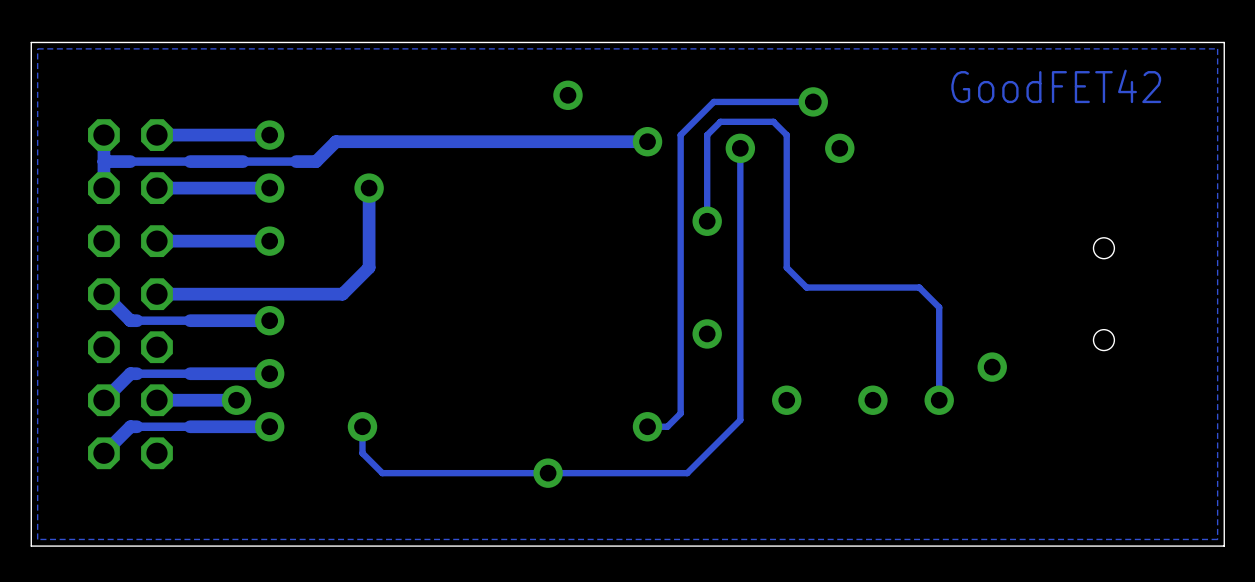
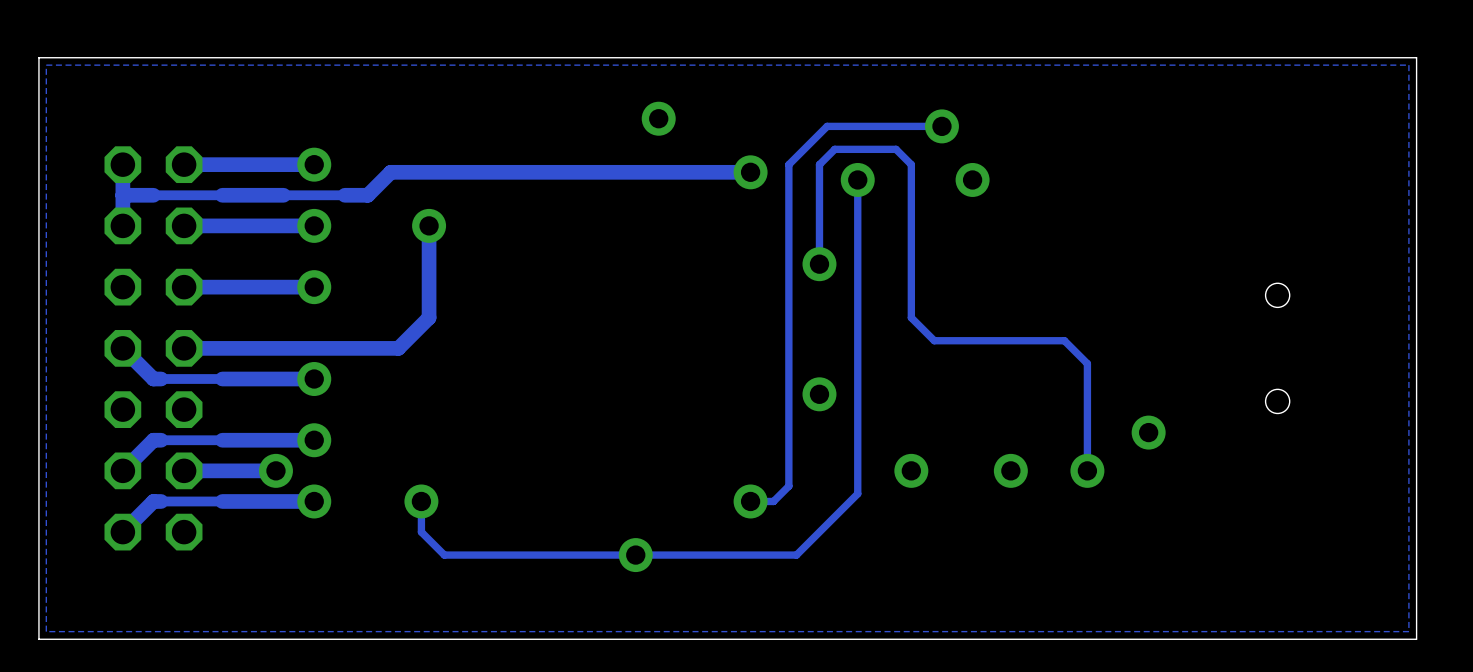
text: GoodFET42 (1056, 86) -> none

